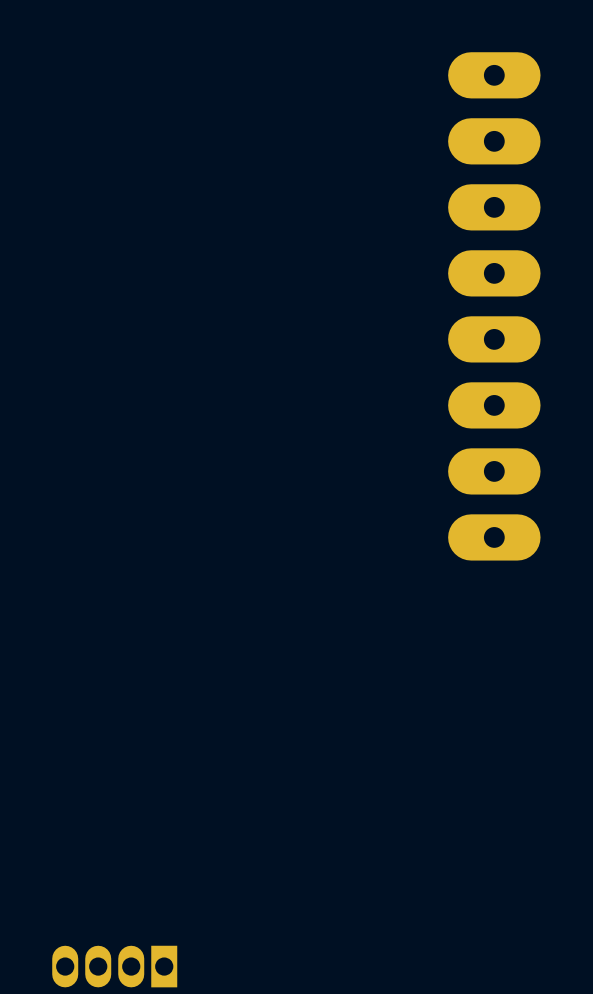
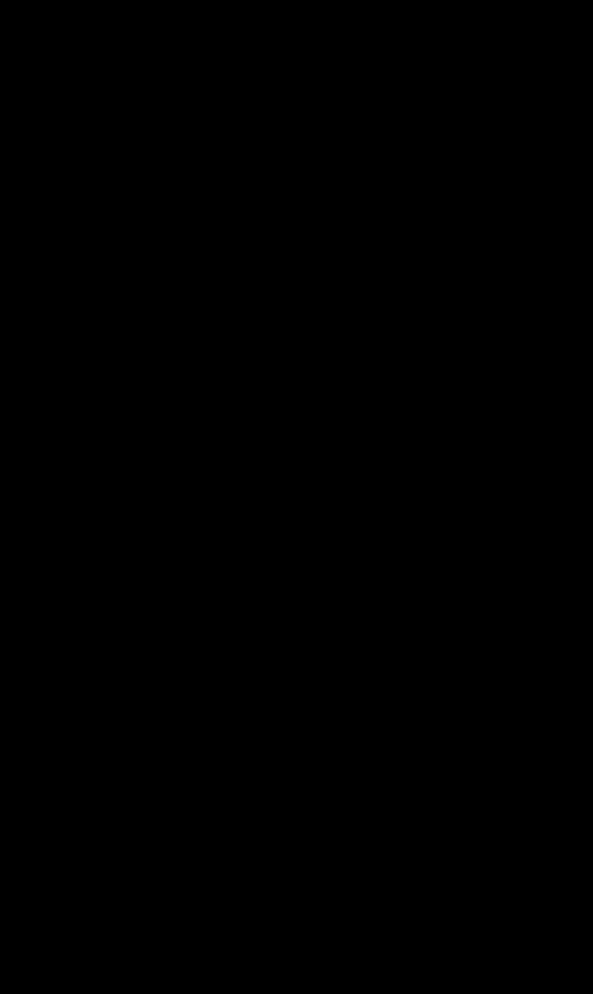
part: (494, 306) -> none
part: (114, 966) -> none

